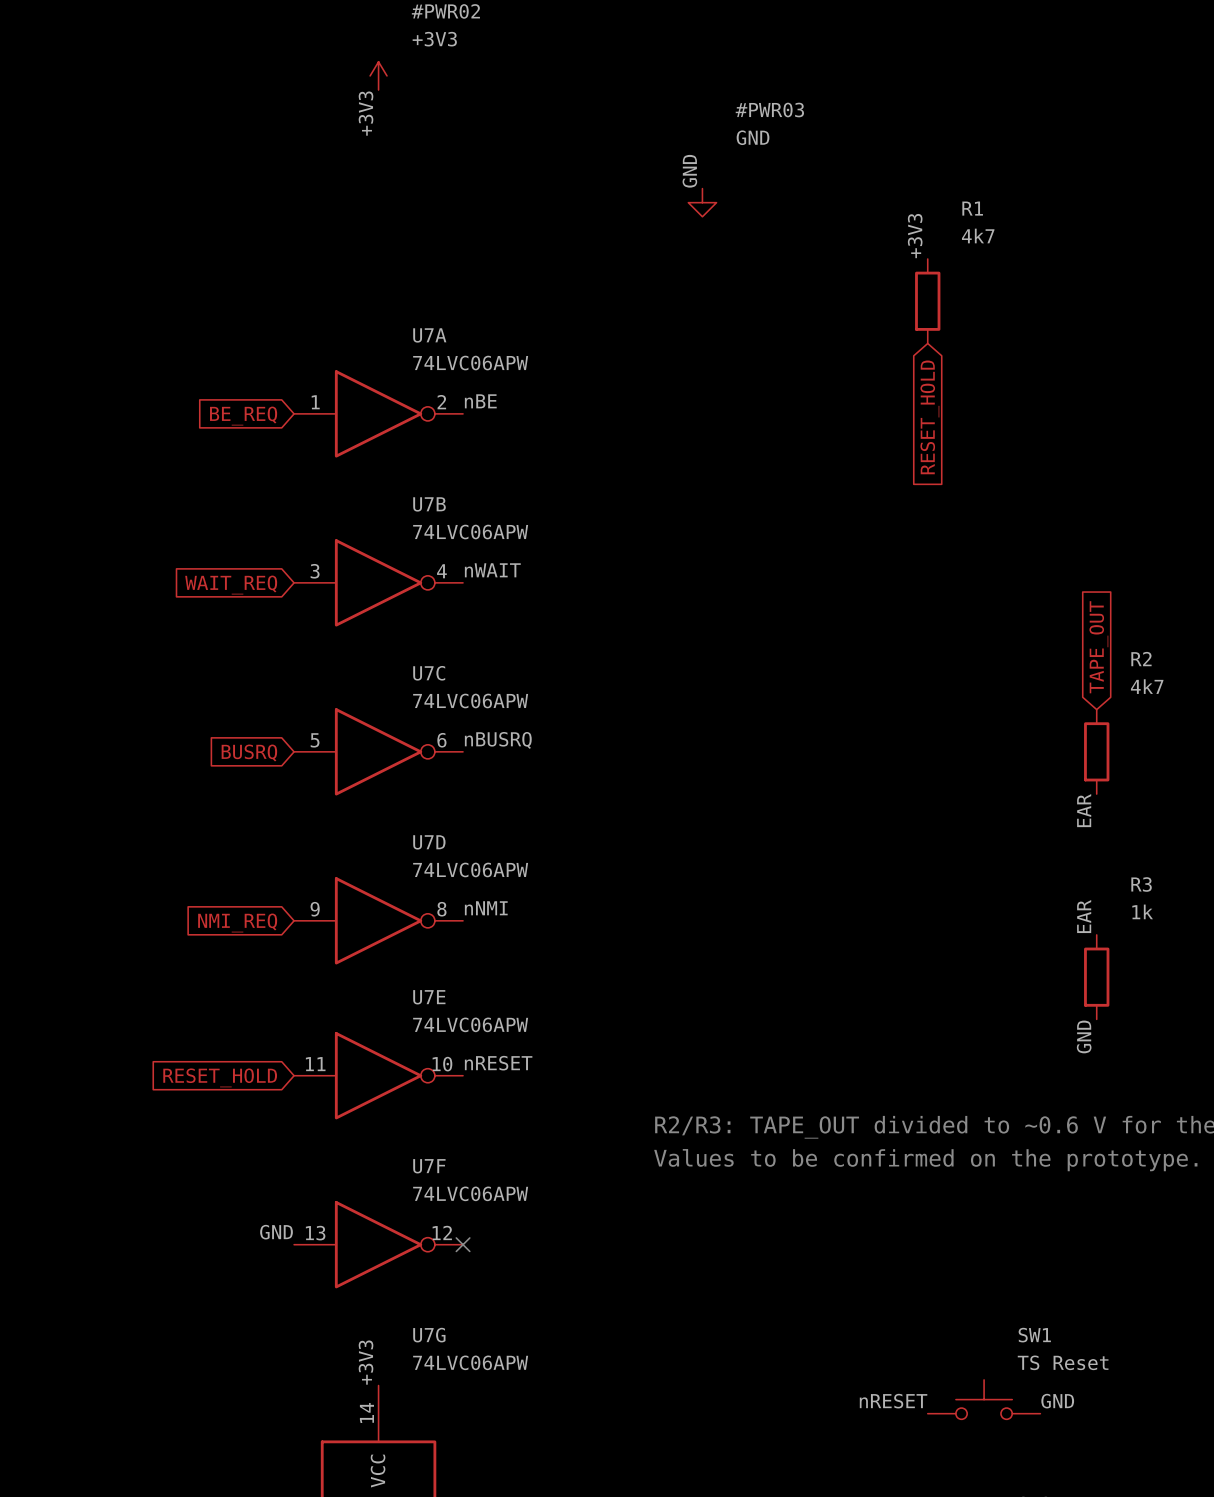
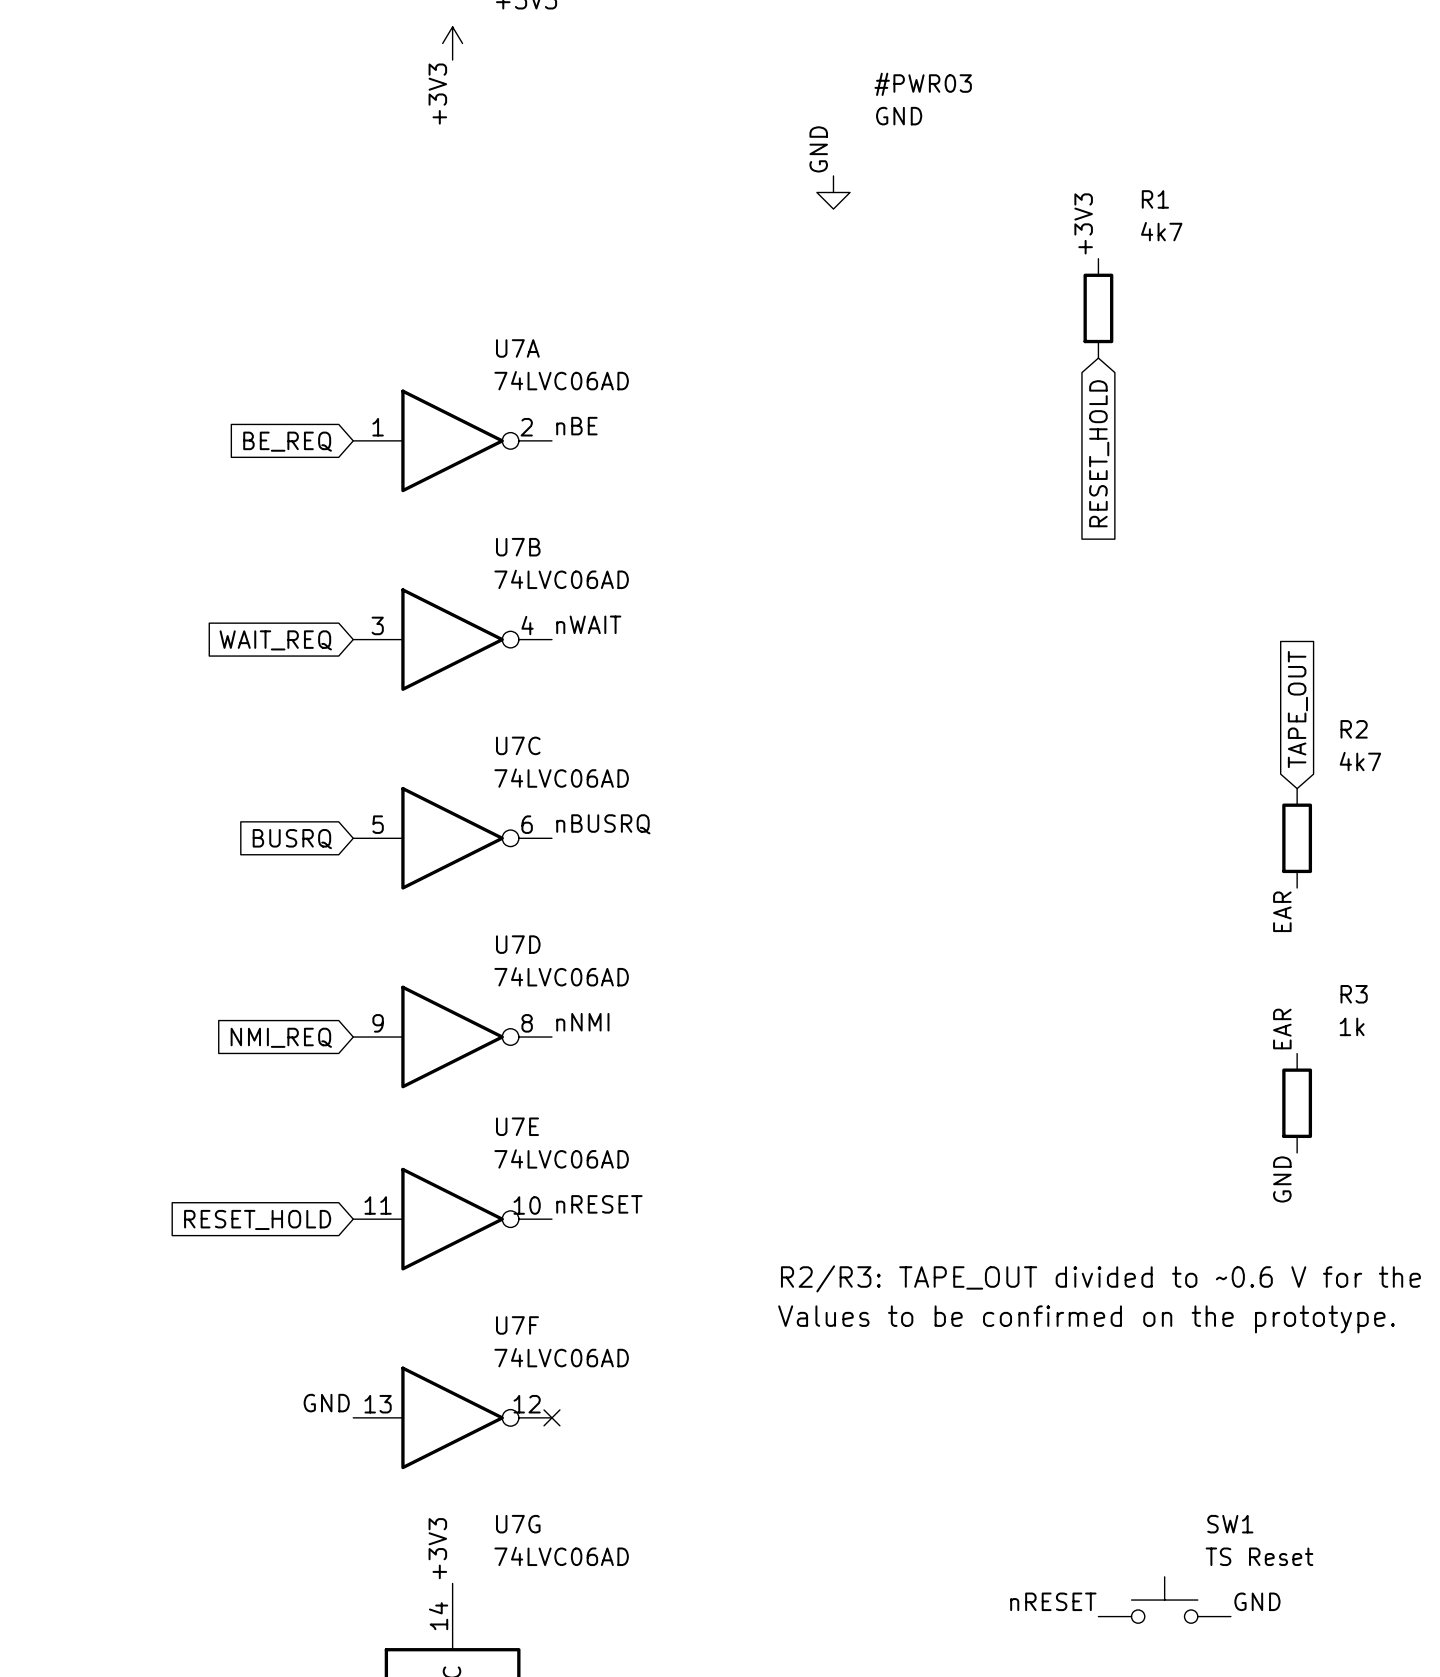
U7A value: 74LVC06APW (470, 363) -> 74LVC06AD (561, 380)
U7B value: 74LVC06APW (470, 532) -> 74LVC06AD (561, 579)
U7C value: 74LVC06APW (470, 700) -> 74LVC06AD (561, 778)
U7D value: 74LVC06APW (470, 869) -> 74LVC06AD (561, 976)
U7E value: 74LVC06APW (470, 1024) -> 74LVC06AD (561, 1158)
U7F value: 74LVC06APW (470, 1193) -> 74LVC06AD (561, 1357)
U7G value: 74LVC06APW (470, 1362) -> 74LVC06AD (561, 1556)

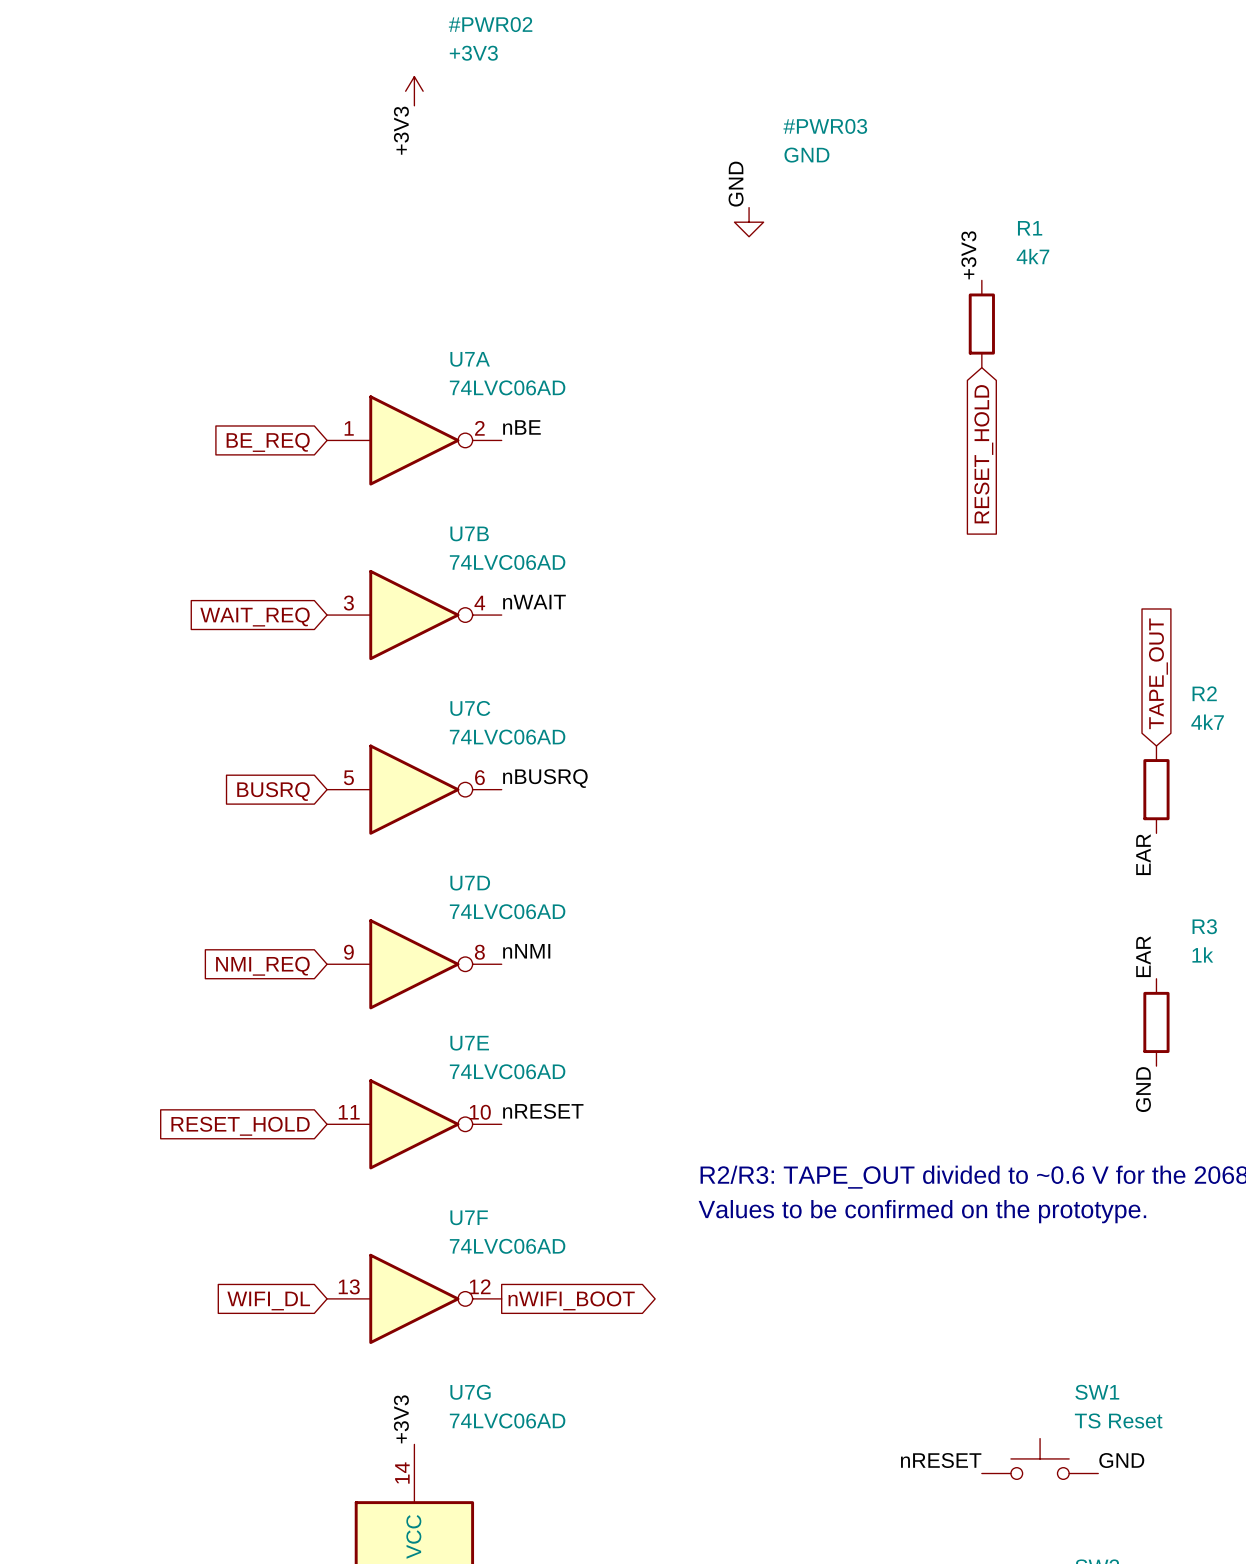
label: GND (326, 1403) -> none
no-connect mark: (551, 1417) -> none
global label: none -> WIFI_DL (268, 1301)
global label: none -> nWIFI_BOOT (571, 1300)

